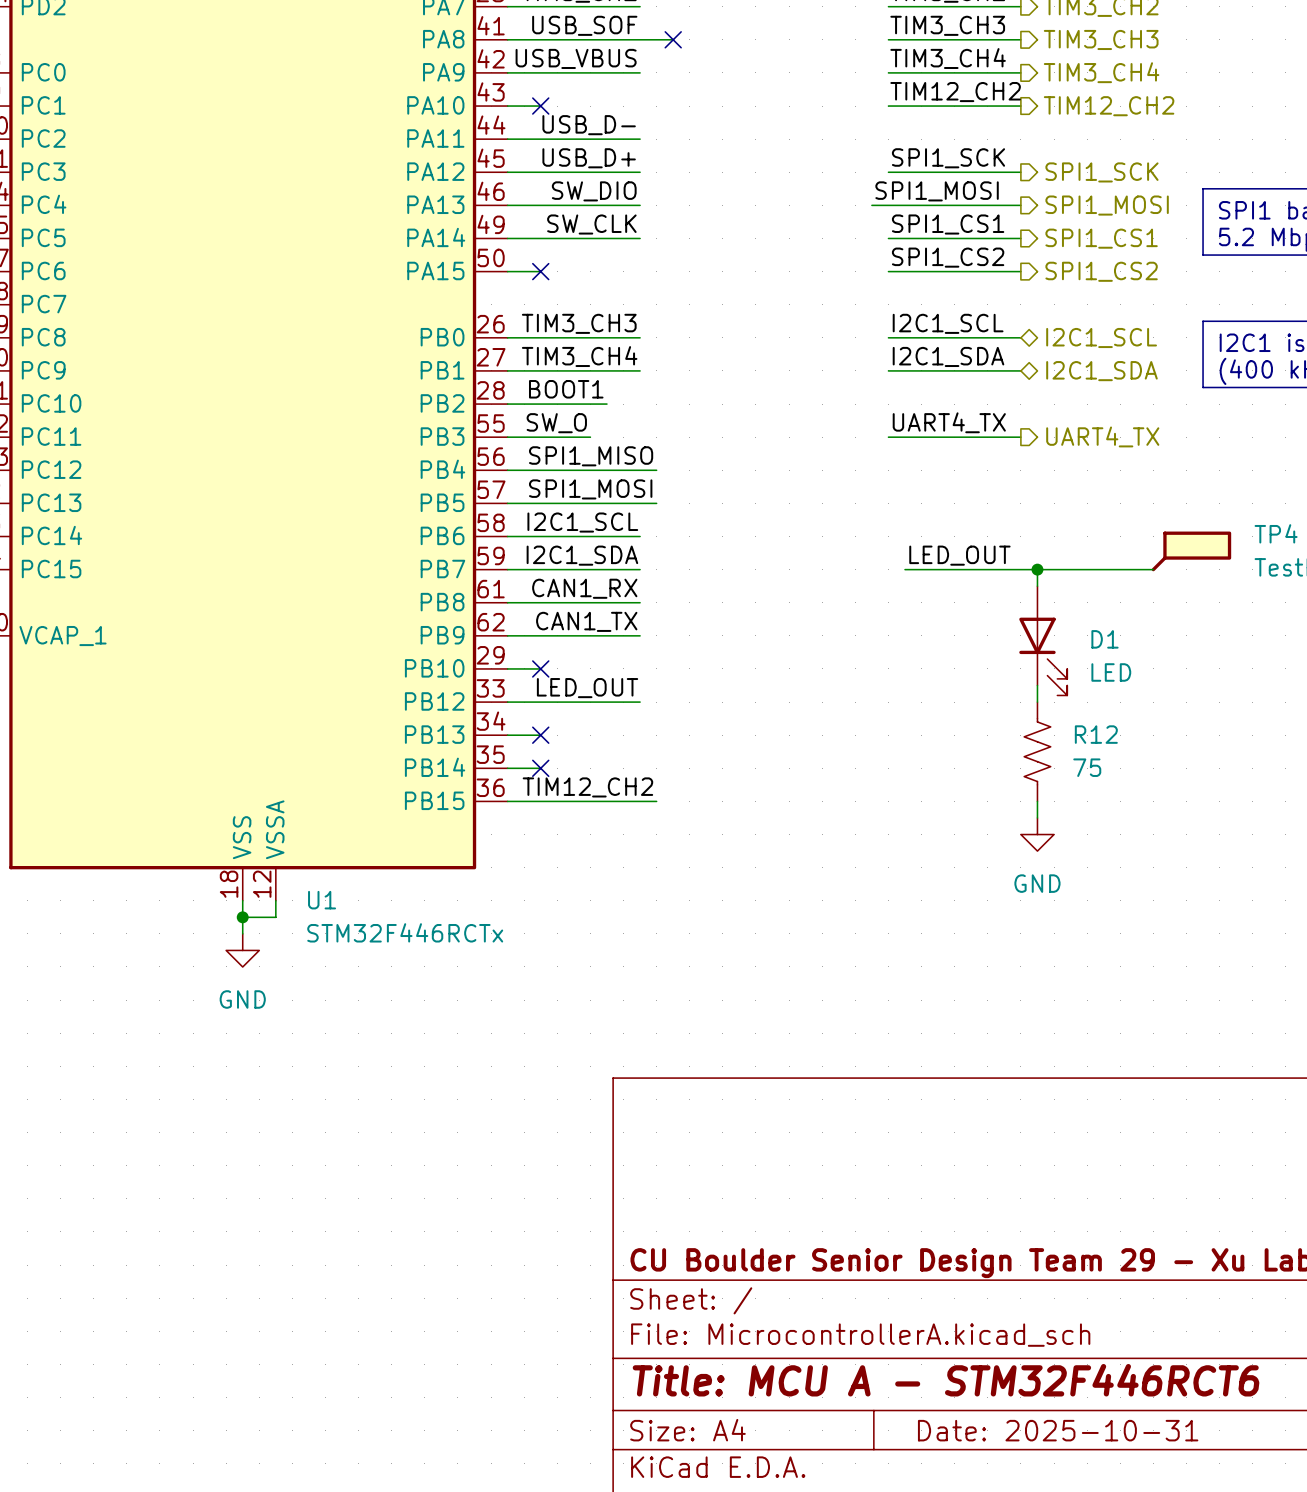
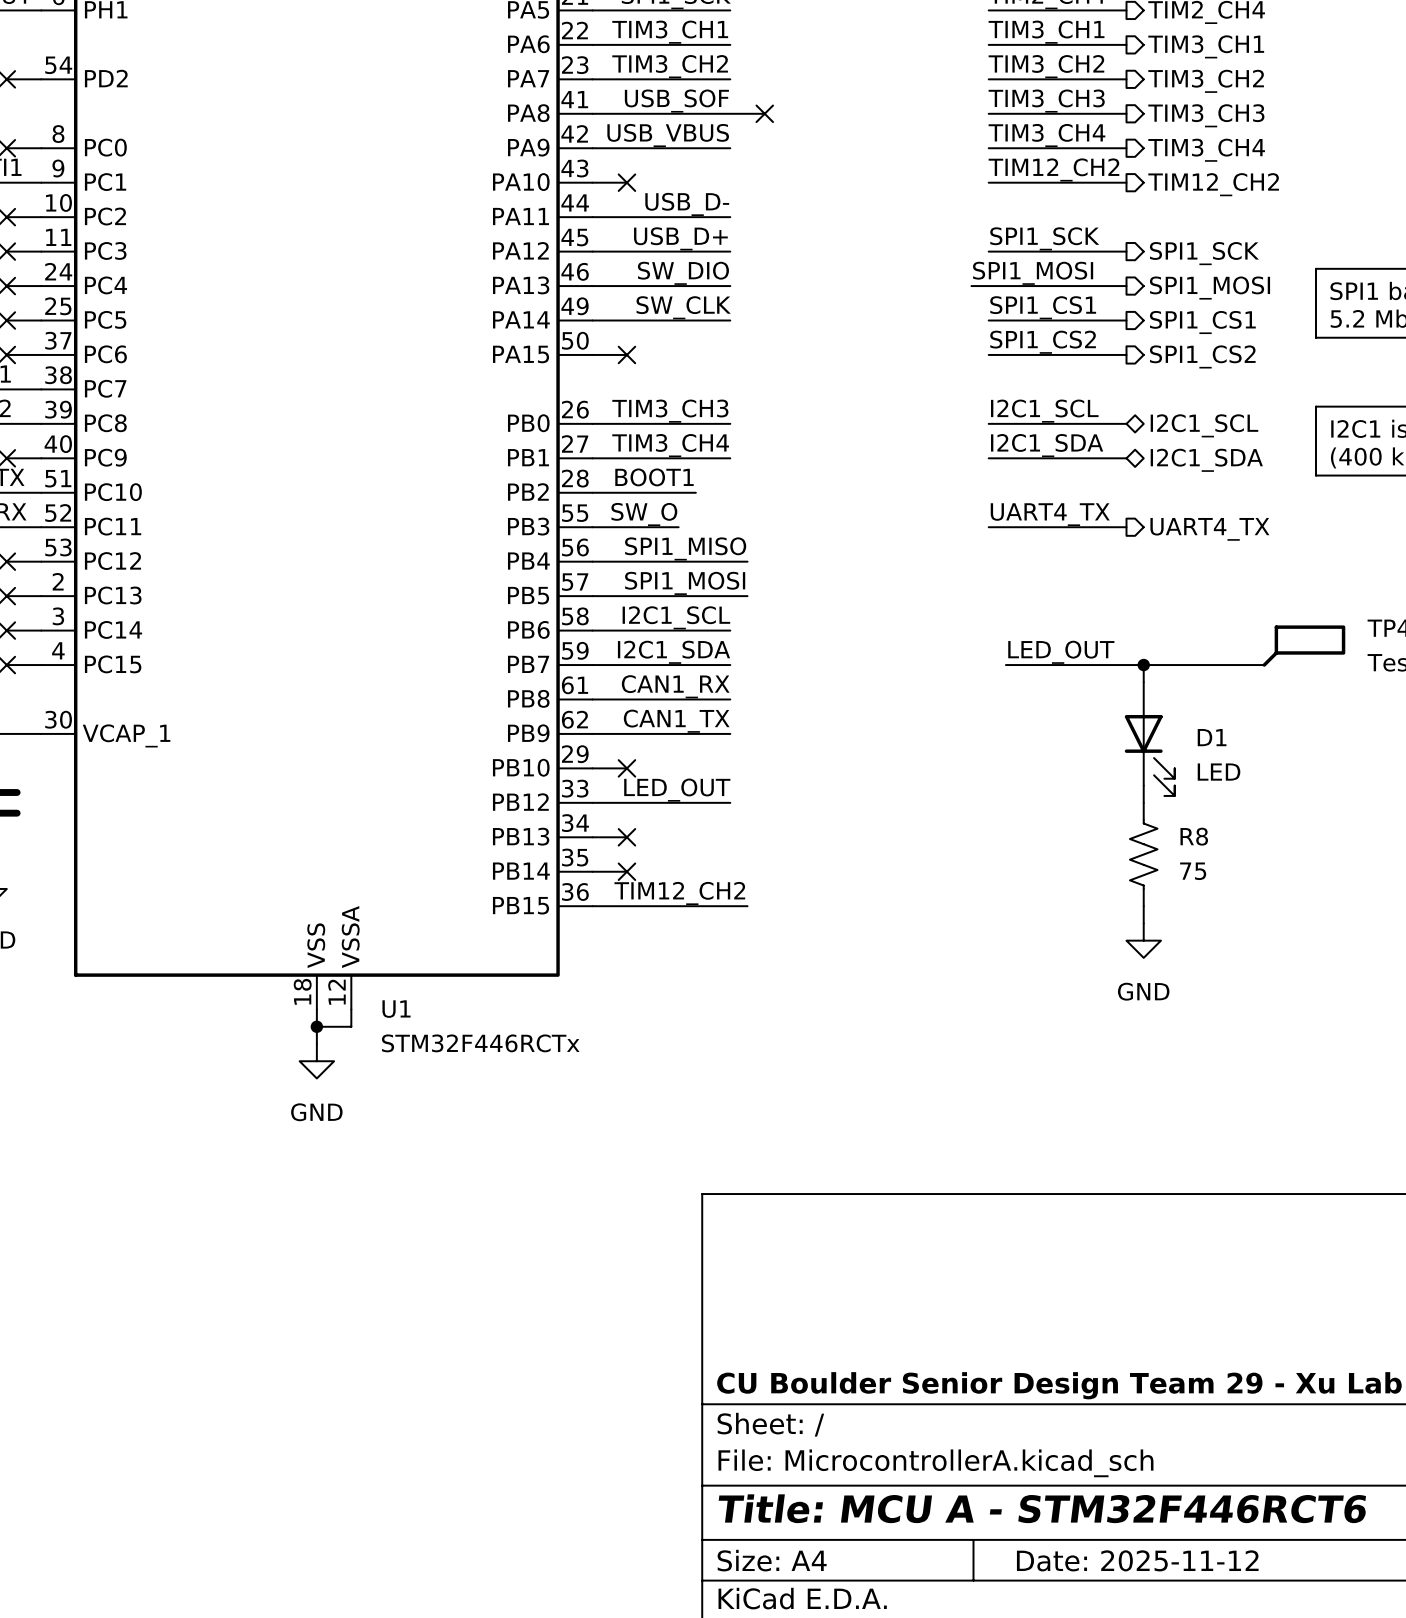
R12 name: R12 (1096, 734) -> R8 (1194, 836)
title block: Date: 2025-10-31 (1058, 1430) -> Date: 2025-11-12 (1137, 1560)

